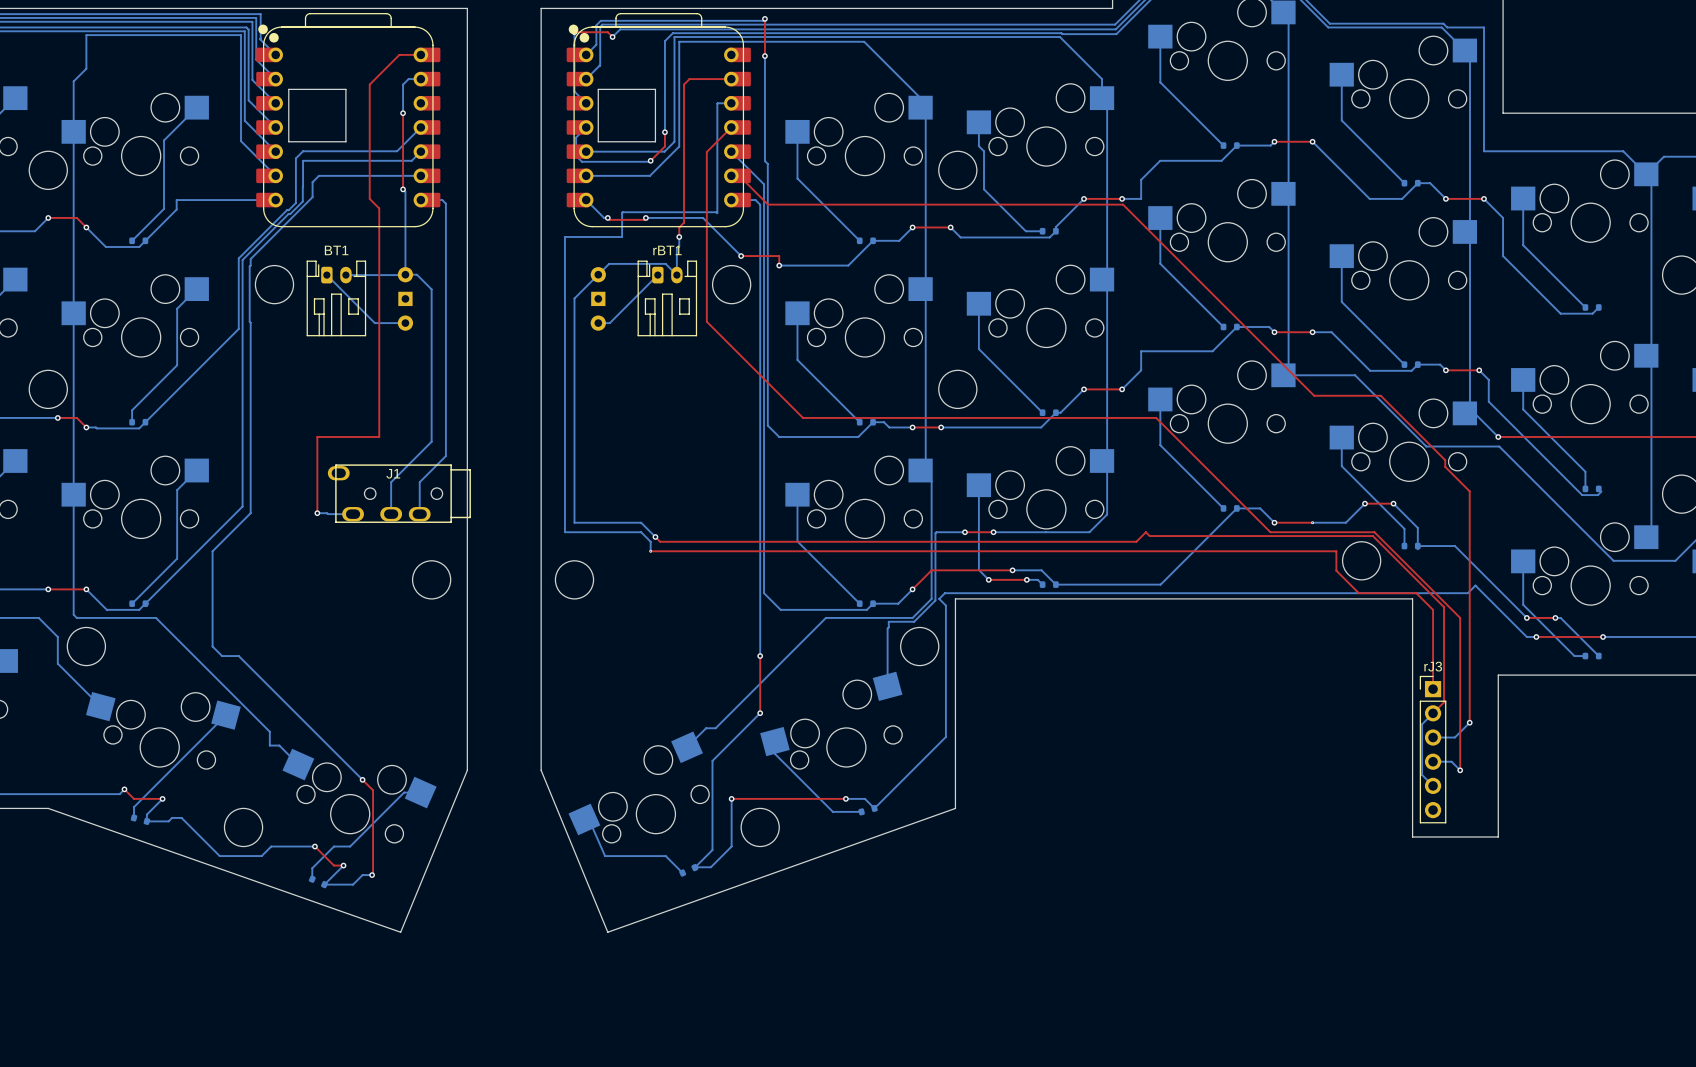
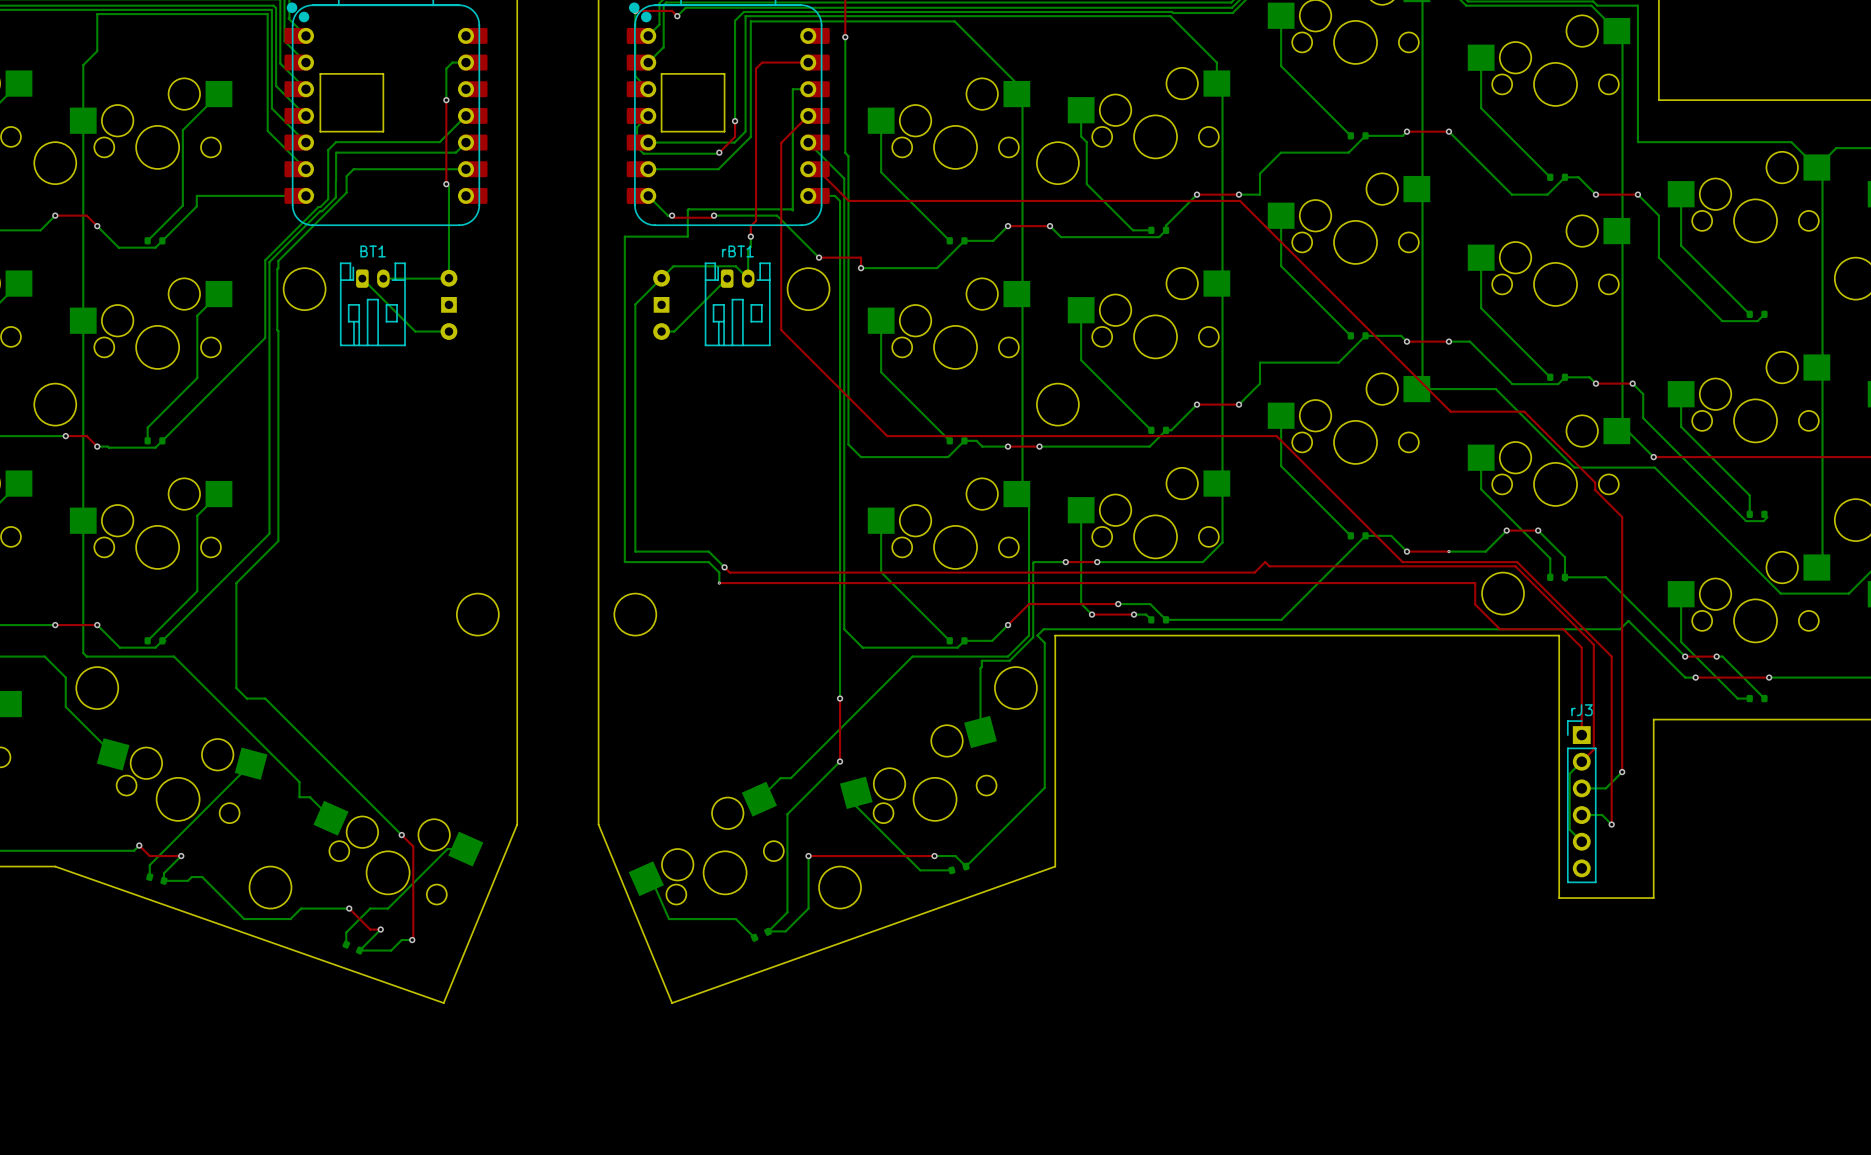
top track: (428, 54) (399, 54) (369, 84) (369, 198) (379, 208) (379, 437) (317, 437) (317, 513) -> none
bottom track: (420, 200) (442, 200) (445, 203) (445, 456) (419, 482) (419, 514) -> none
bottom track: (405, 274) (416, 274) (431, 289) (431, 441) (391, 482) (391, 514) -> none
J1: (399, 493) -> none
bottom track: (317, 513) (353, 514) -> none
via: (317, 513) -> none

